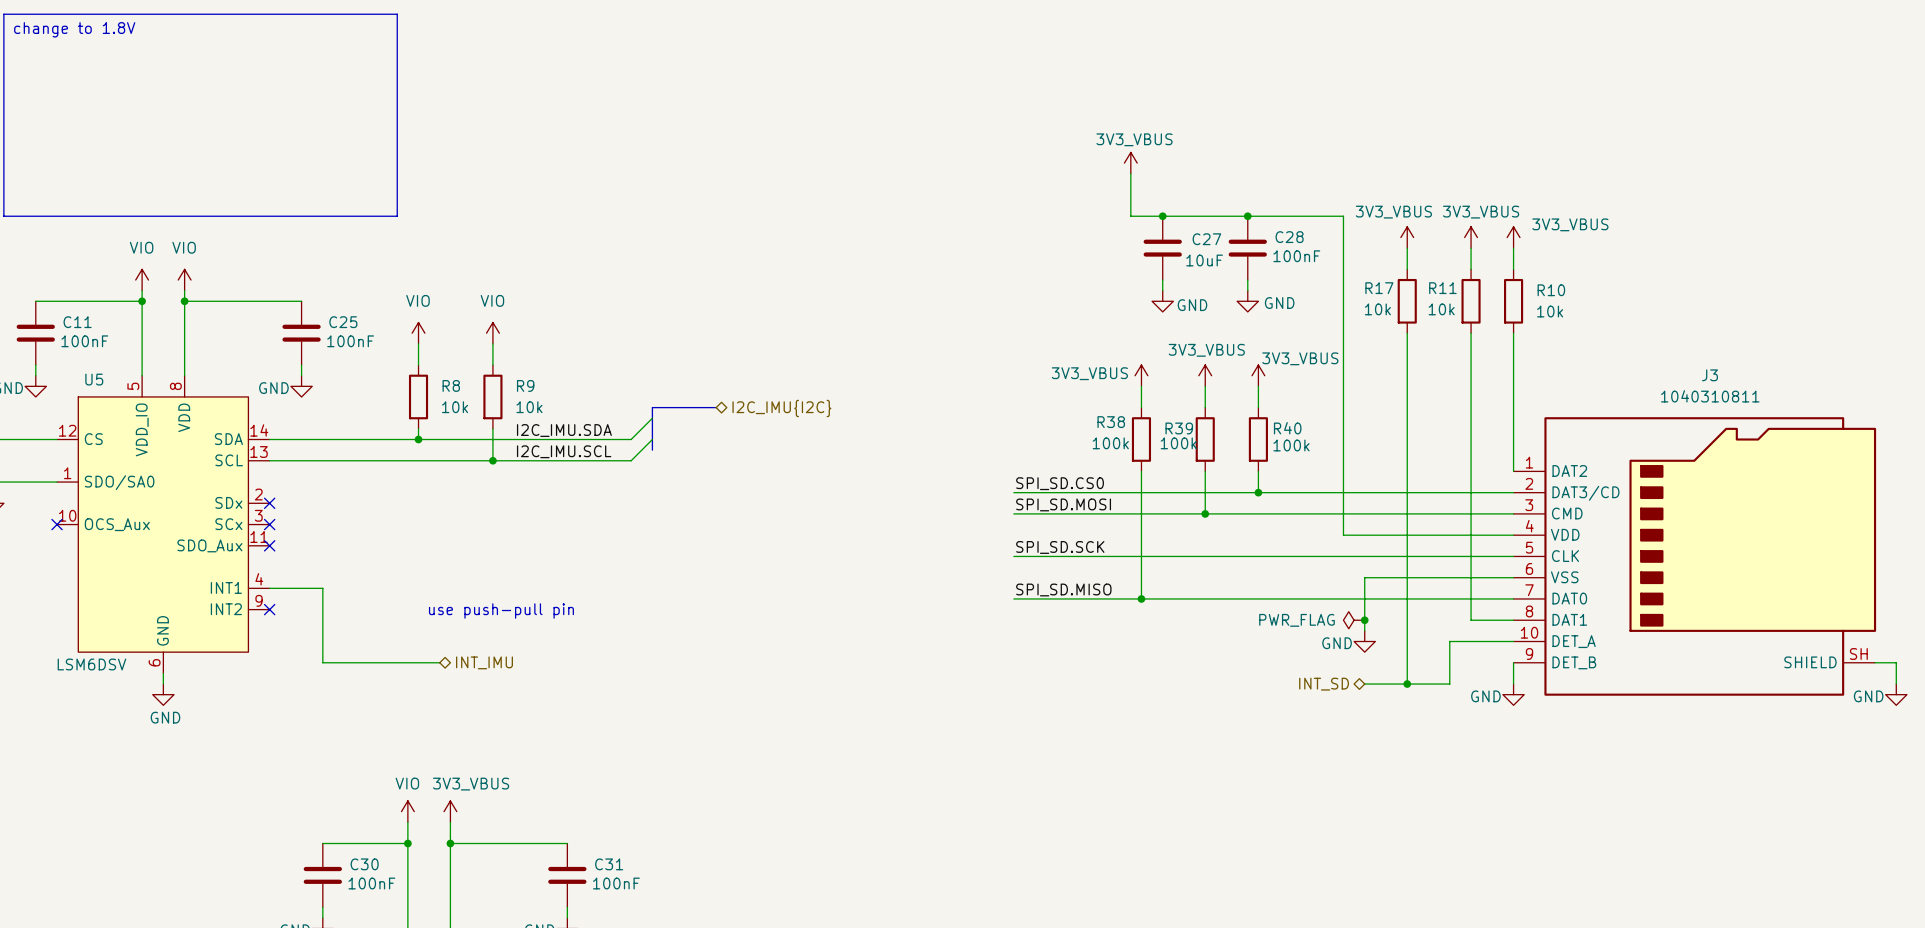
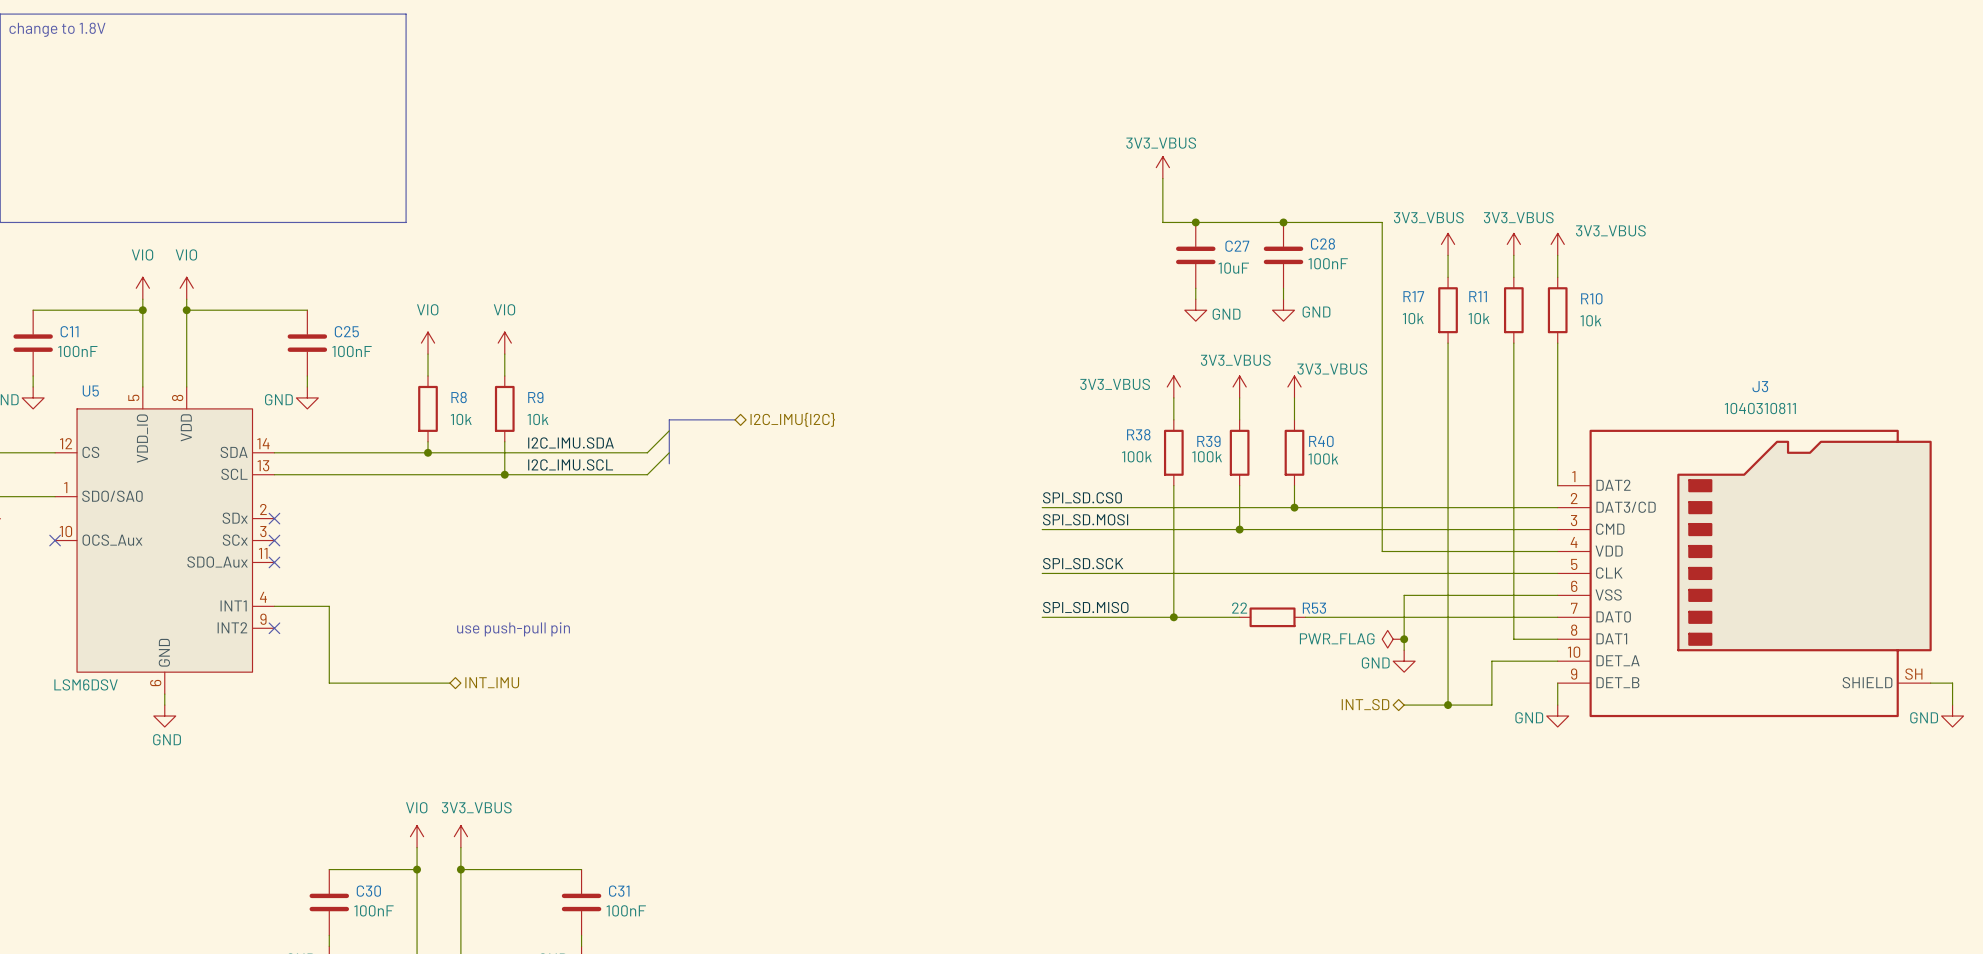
wire: (1205, 598) (1269, 598) -> none
R53: none -> 22 (1272, 617)

